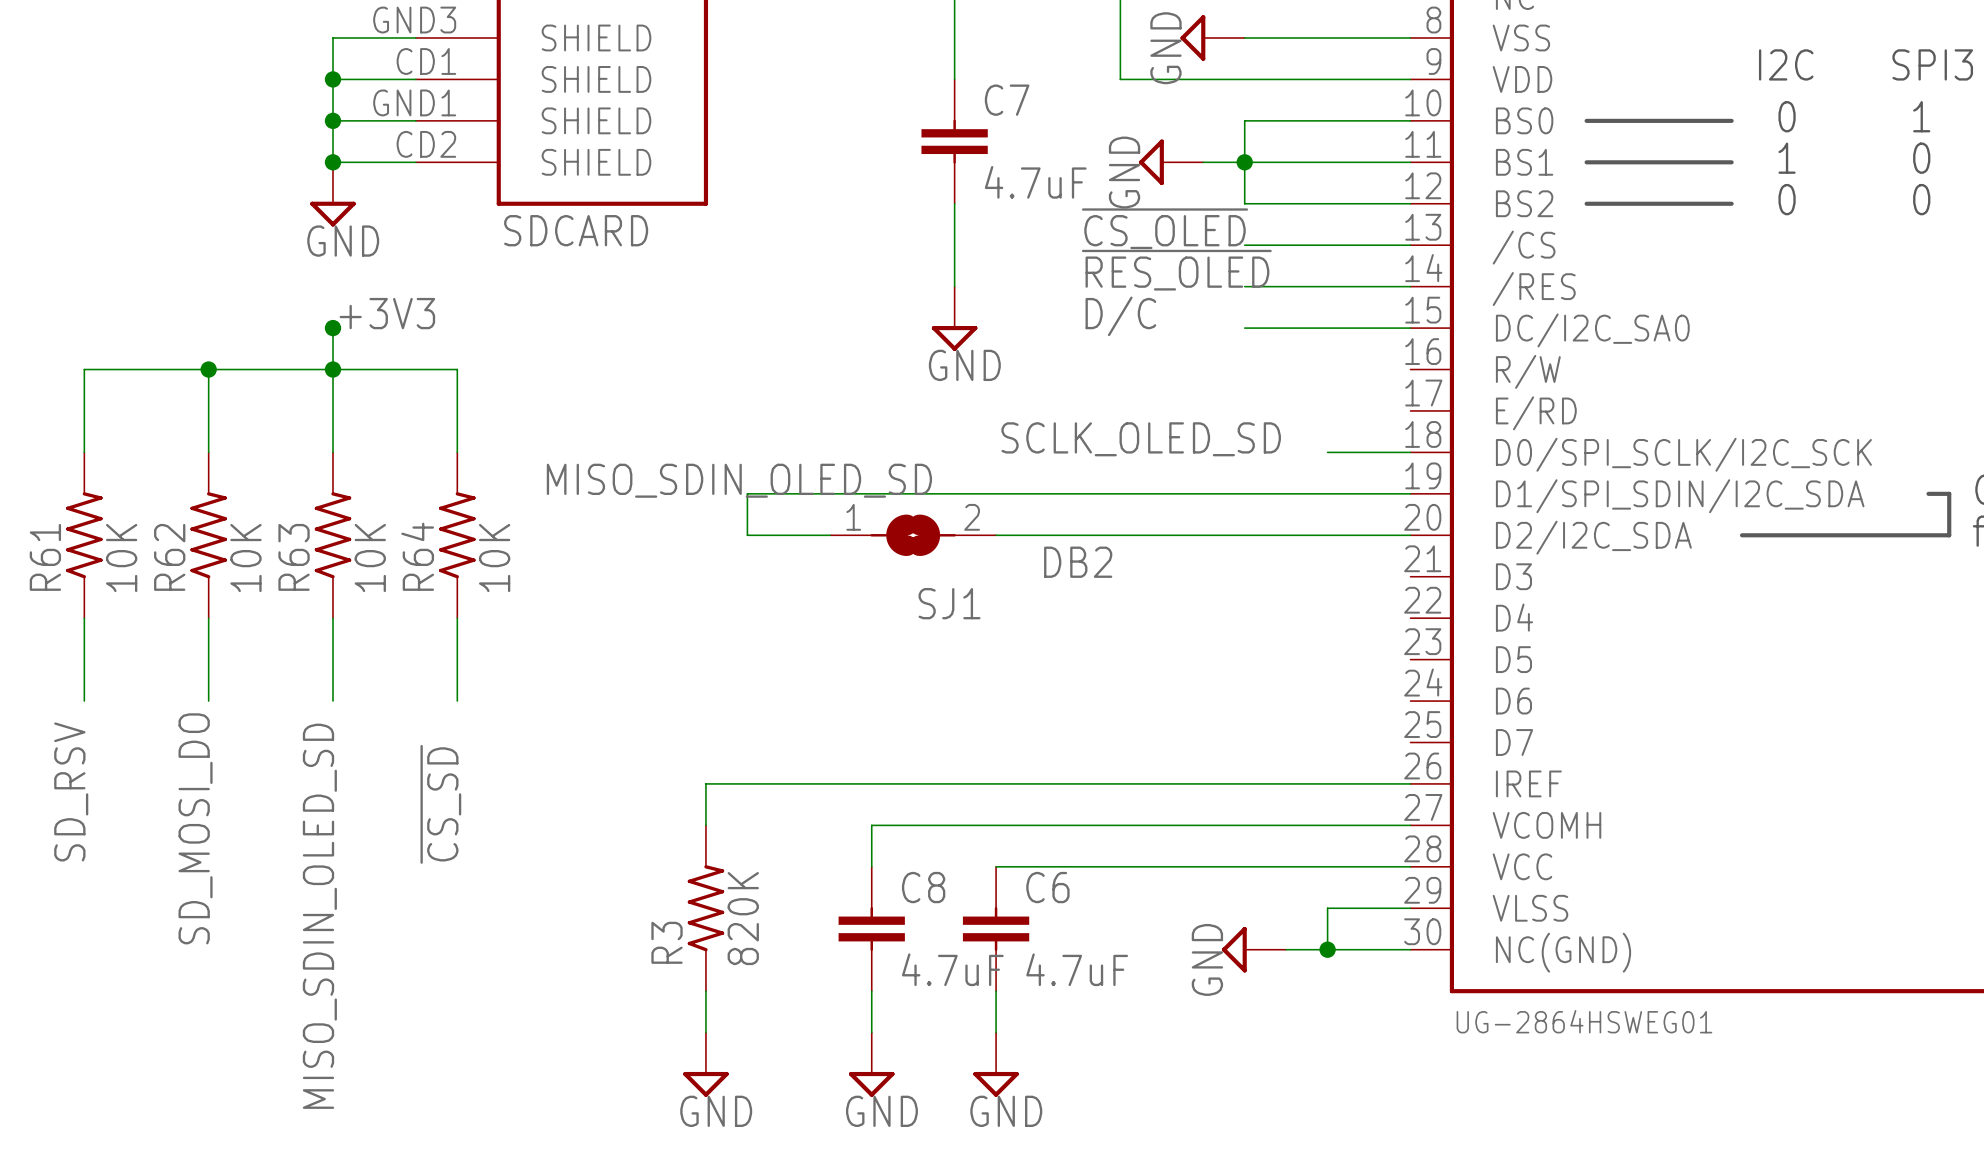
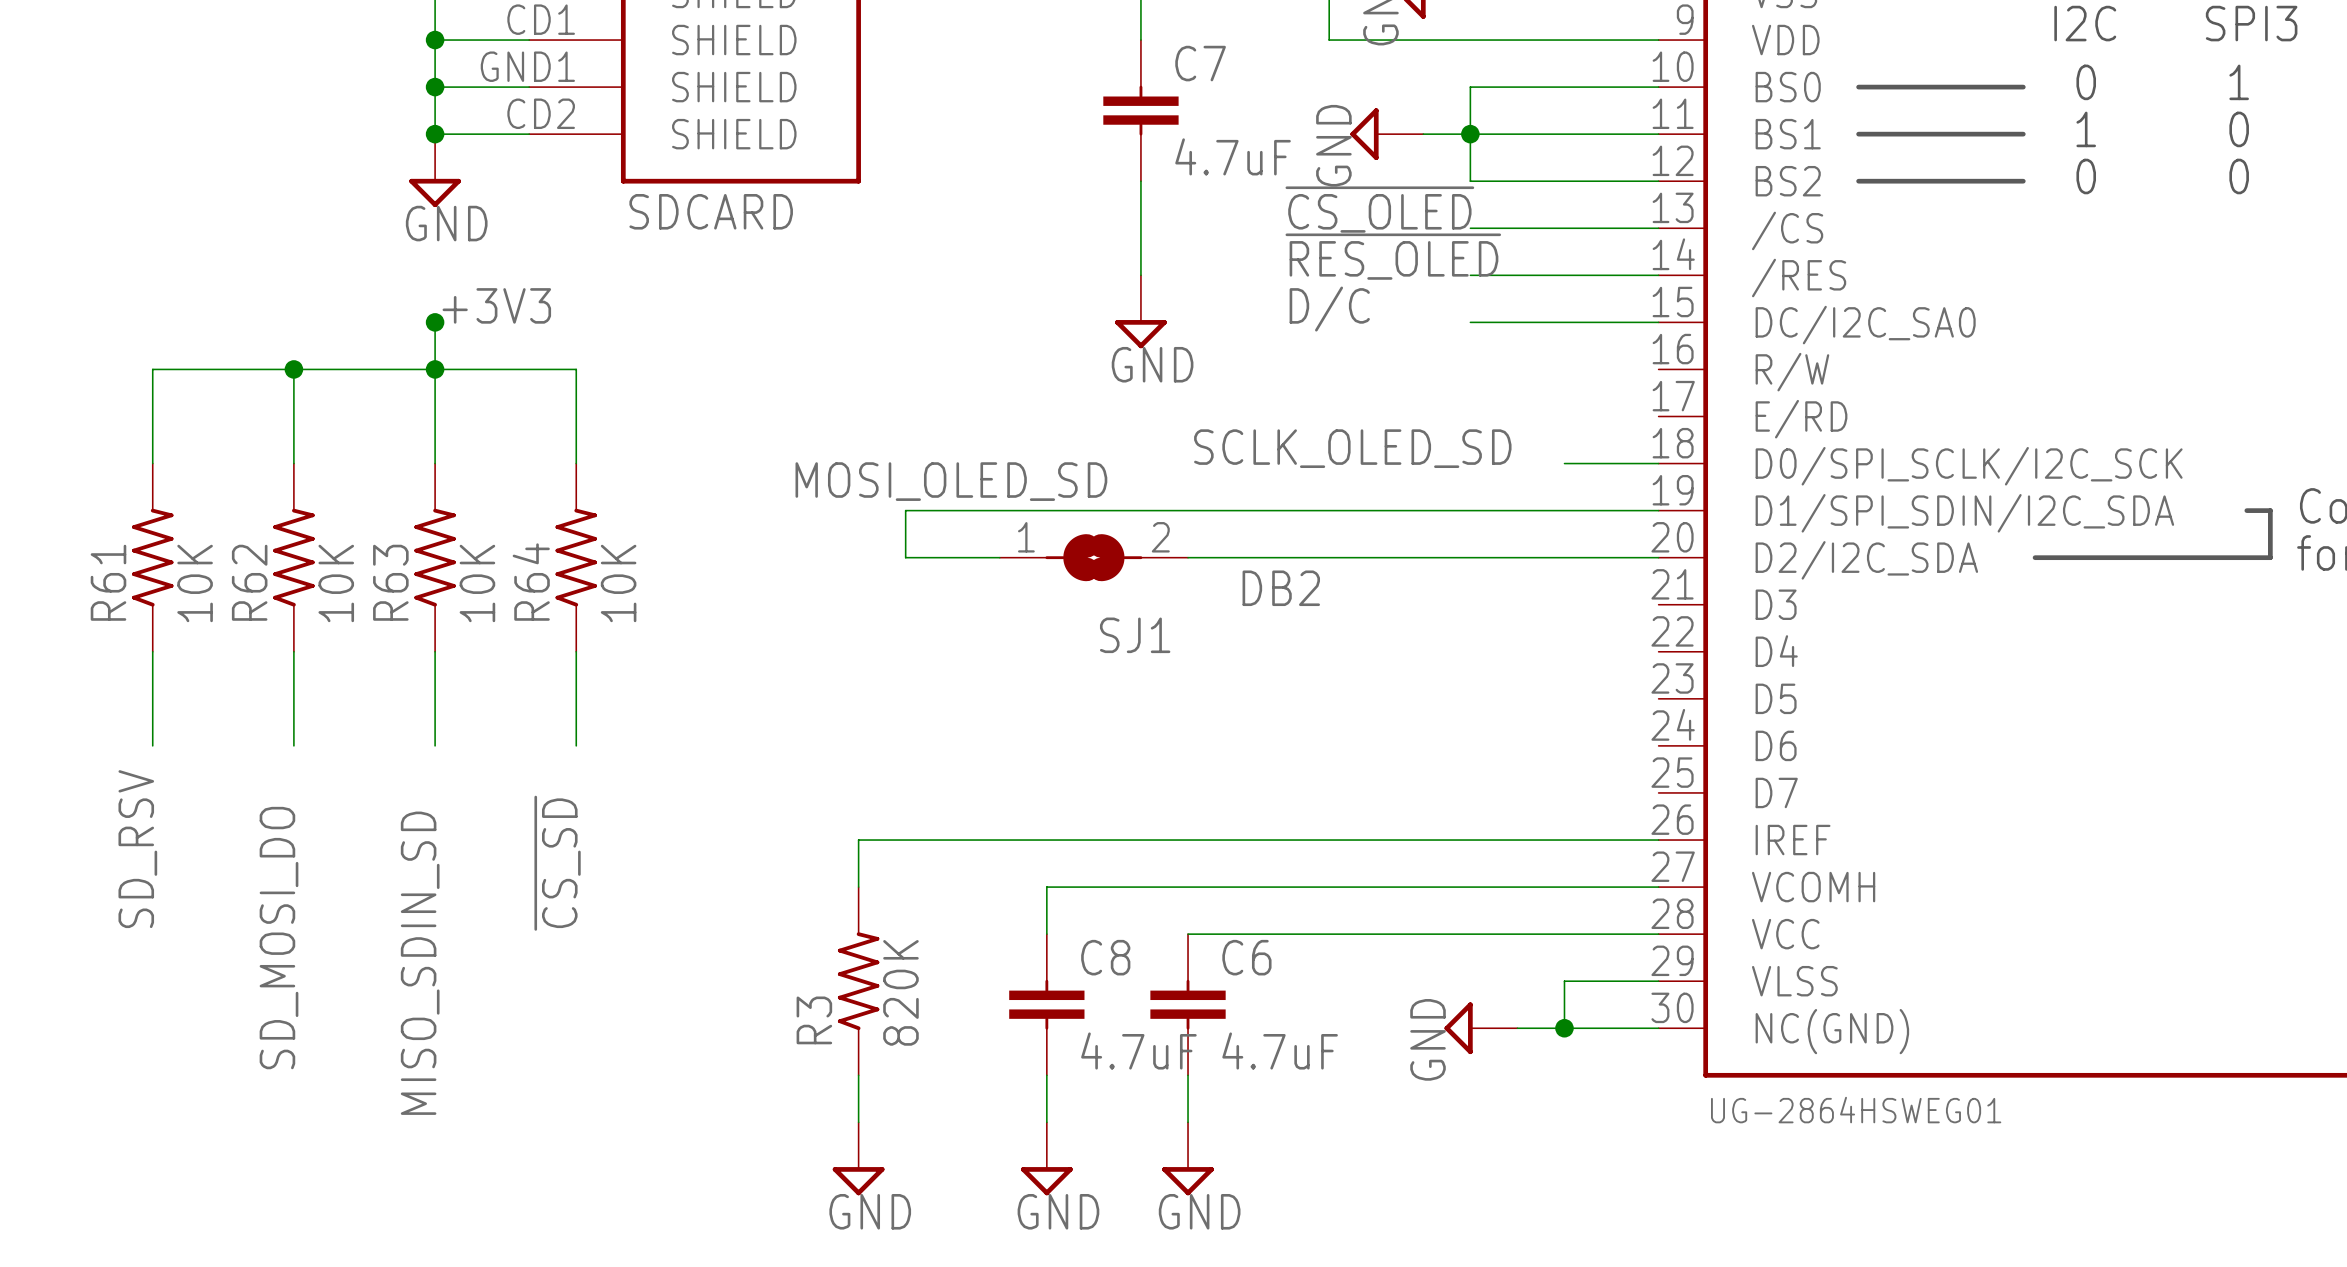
label: MISO_SDIN_OLED_SD (739, 480) -> MOSI_OLED_SD (951, 481)
label position: SD_MOSI_DO (195, 828) -> SD_MOSI_DO (279, 938)
label: MISO_SDIN_OLED_SD (319, 916) -> MISO_SDIN_SD (420, 963)

